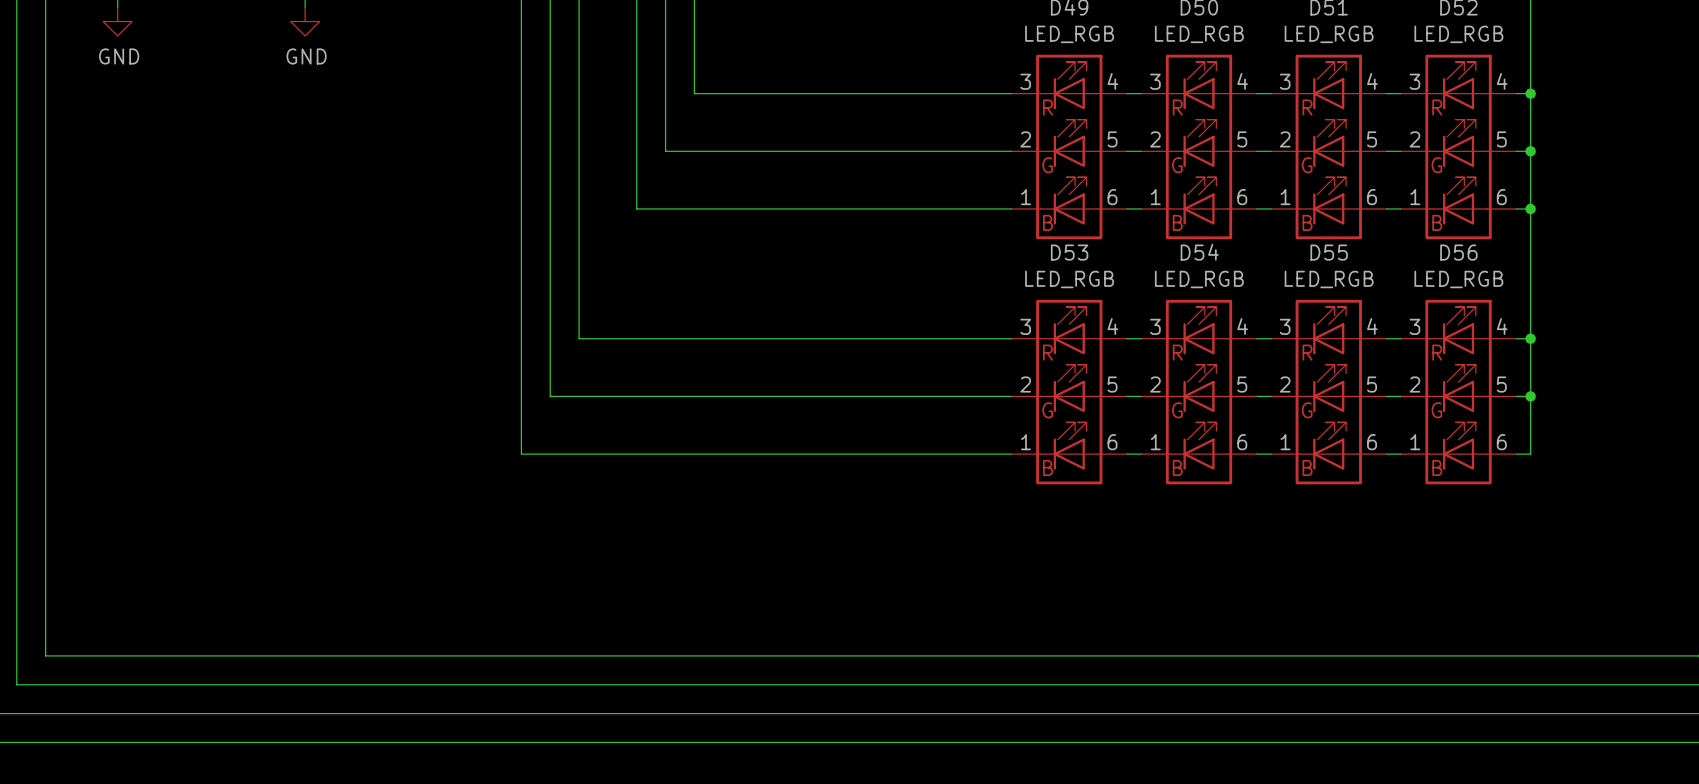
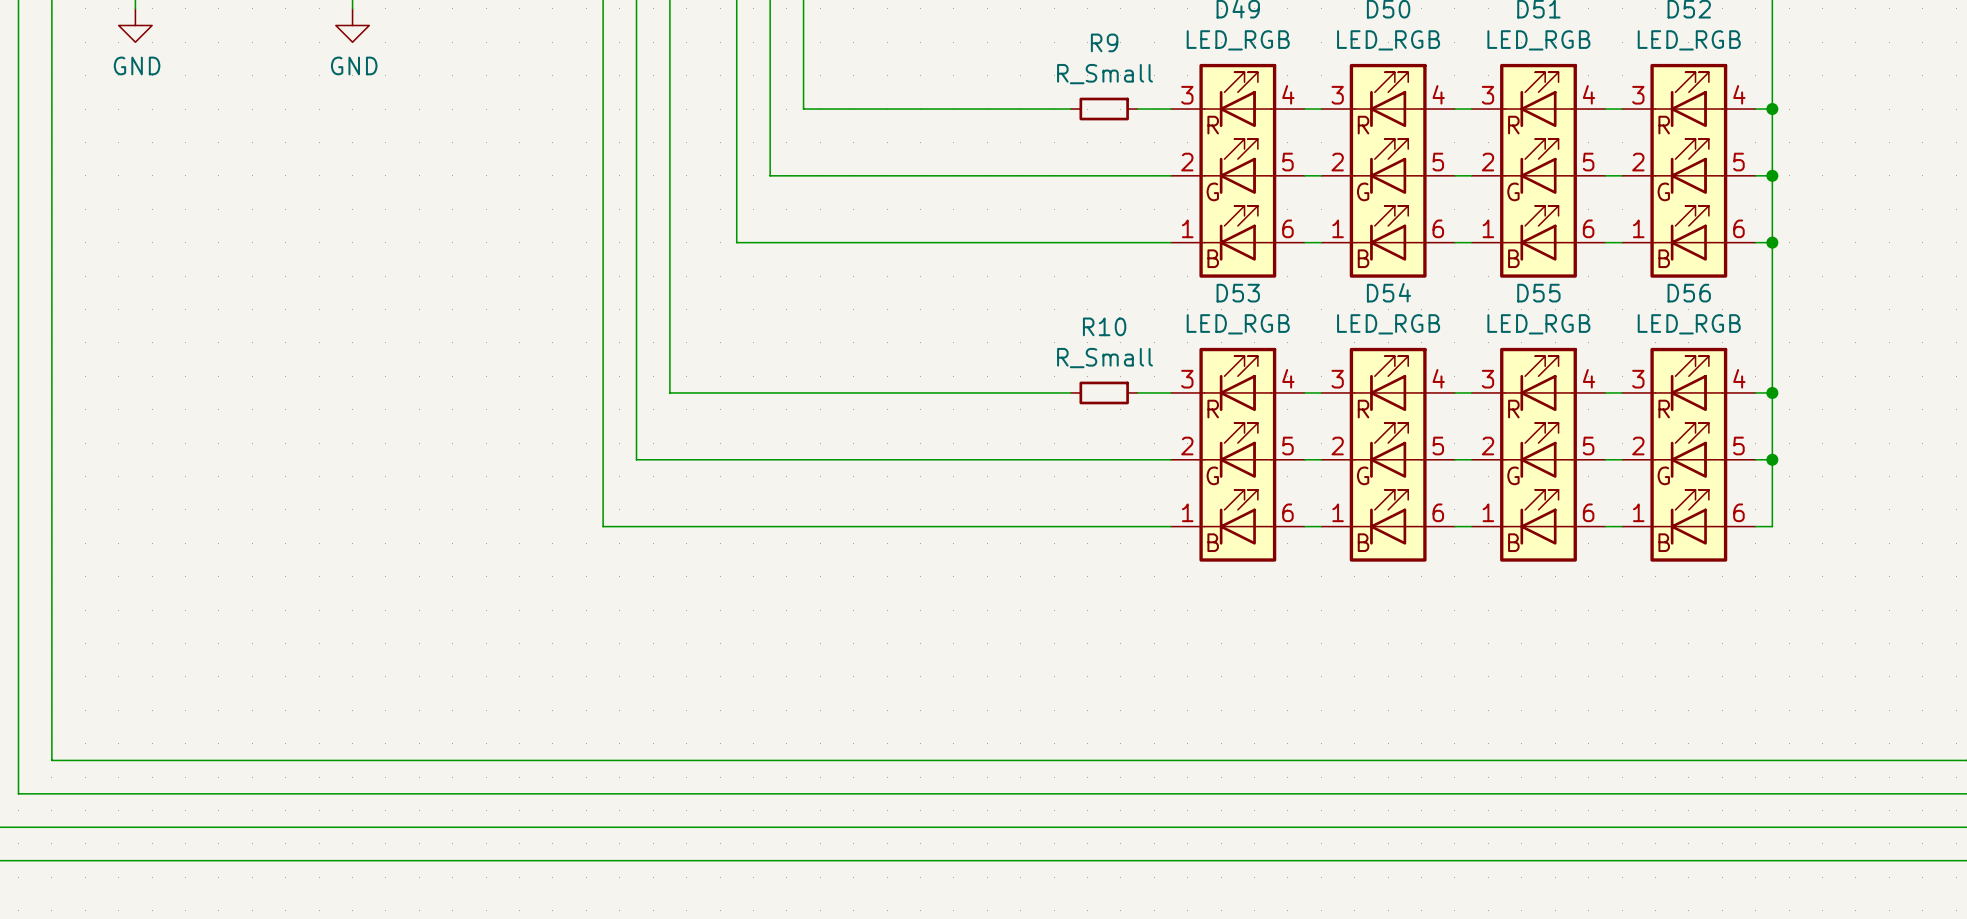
wire: (925, 93) (982, 93) -> none
R9: none -> R_Small (1104, 109)
wire: (925, 338) (982, 338) -> none
R10: none -> R_Small (1104, 392)

